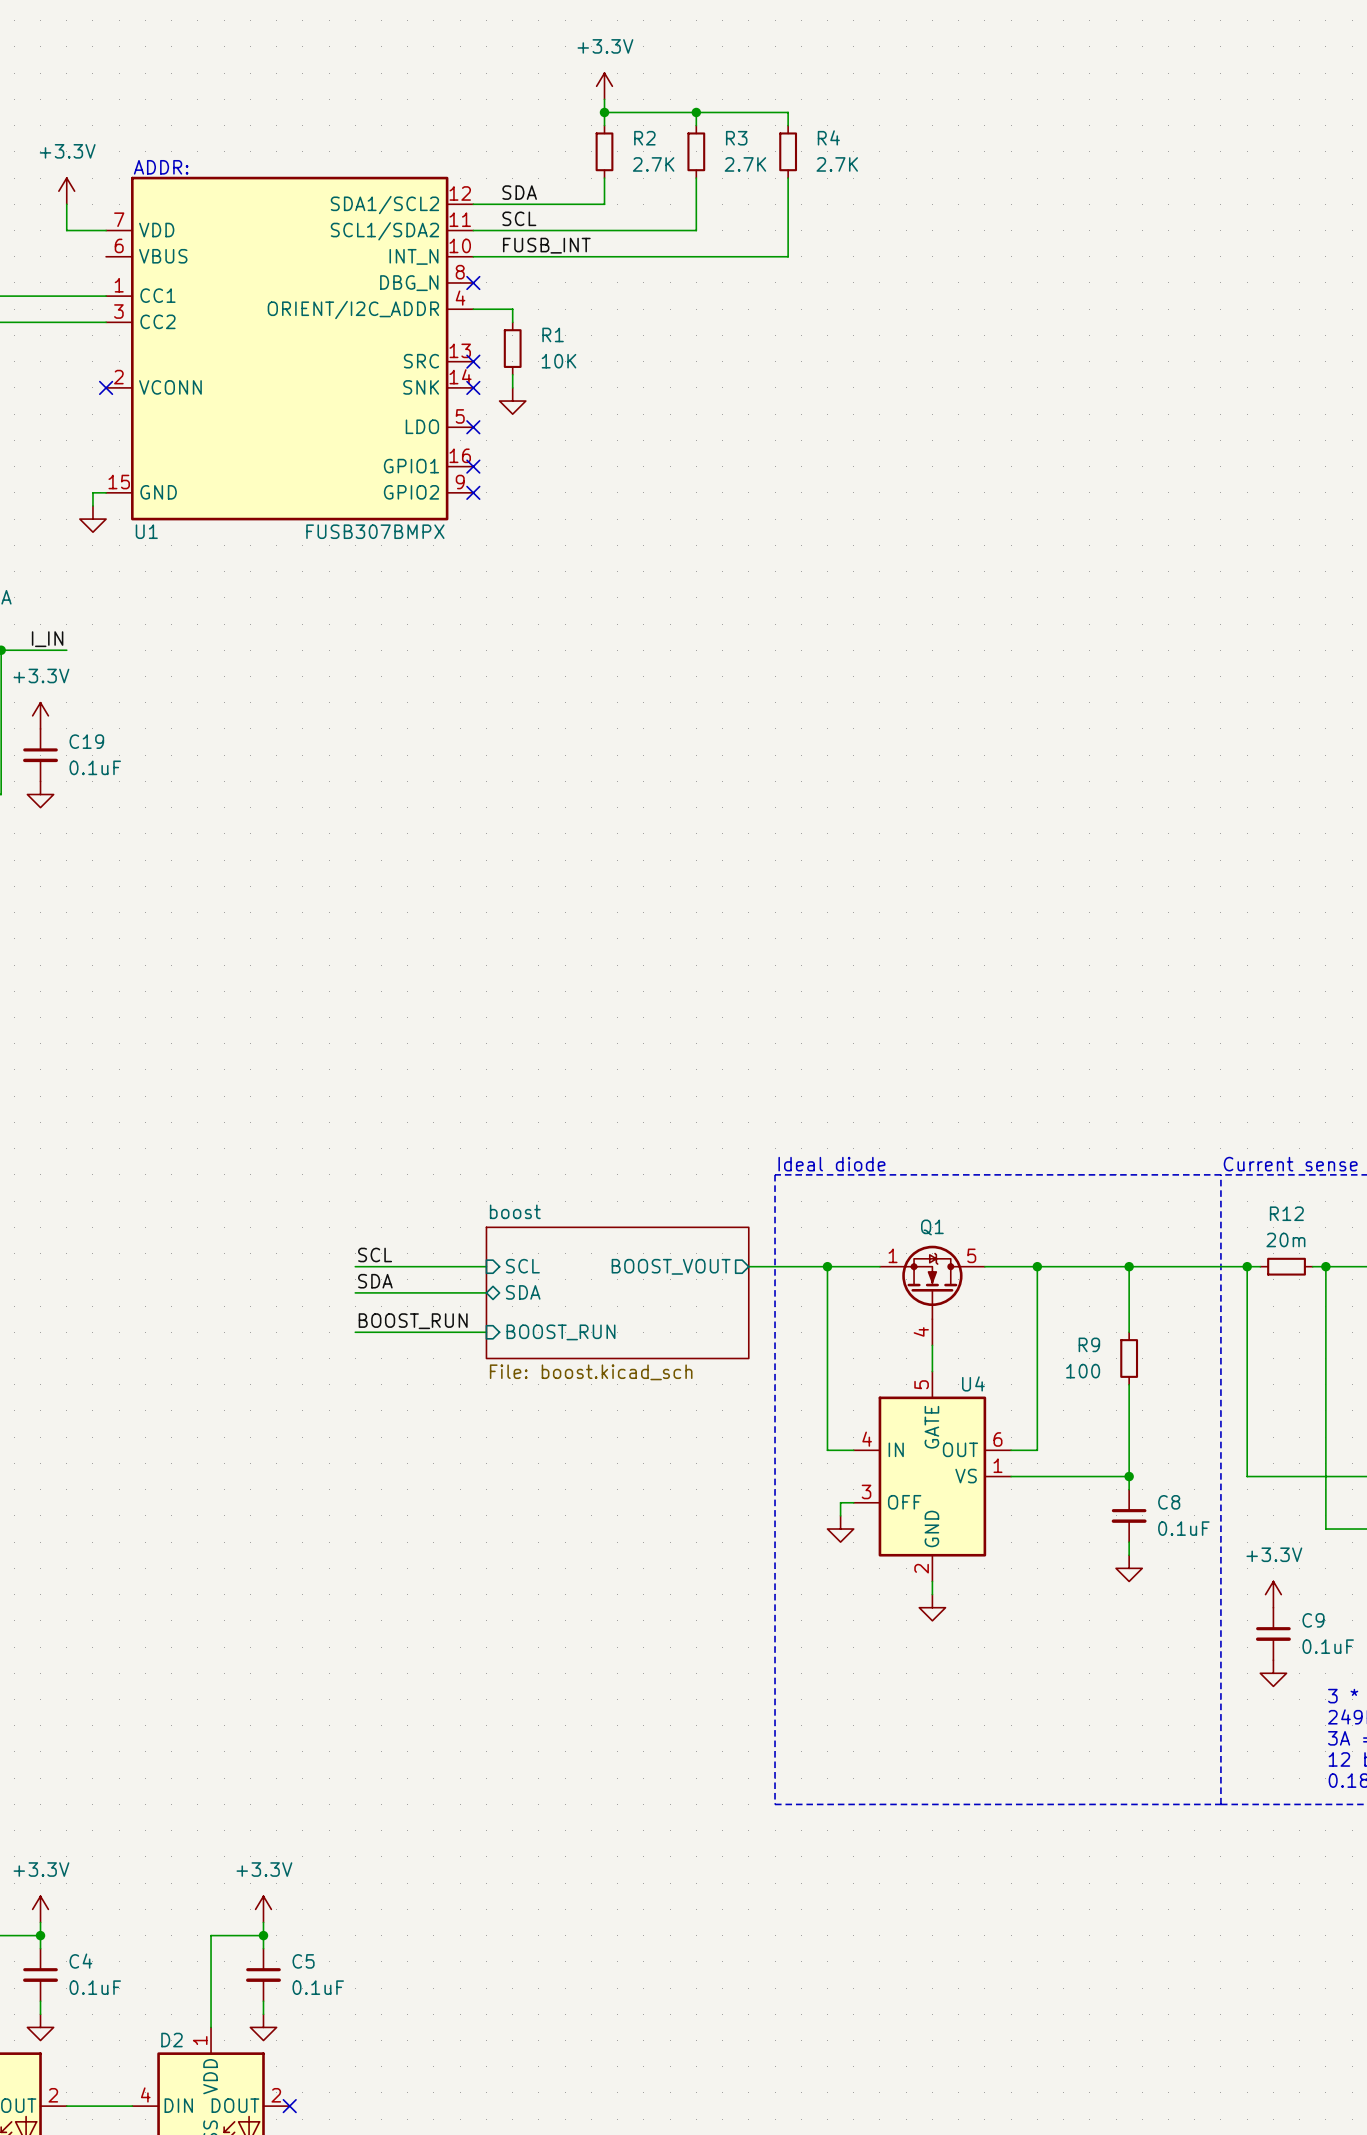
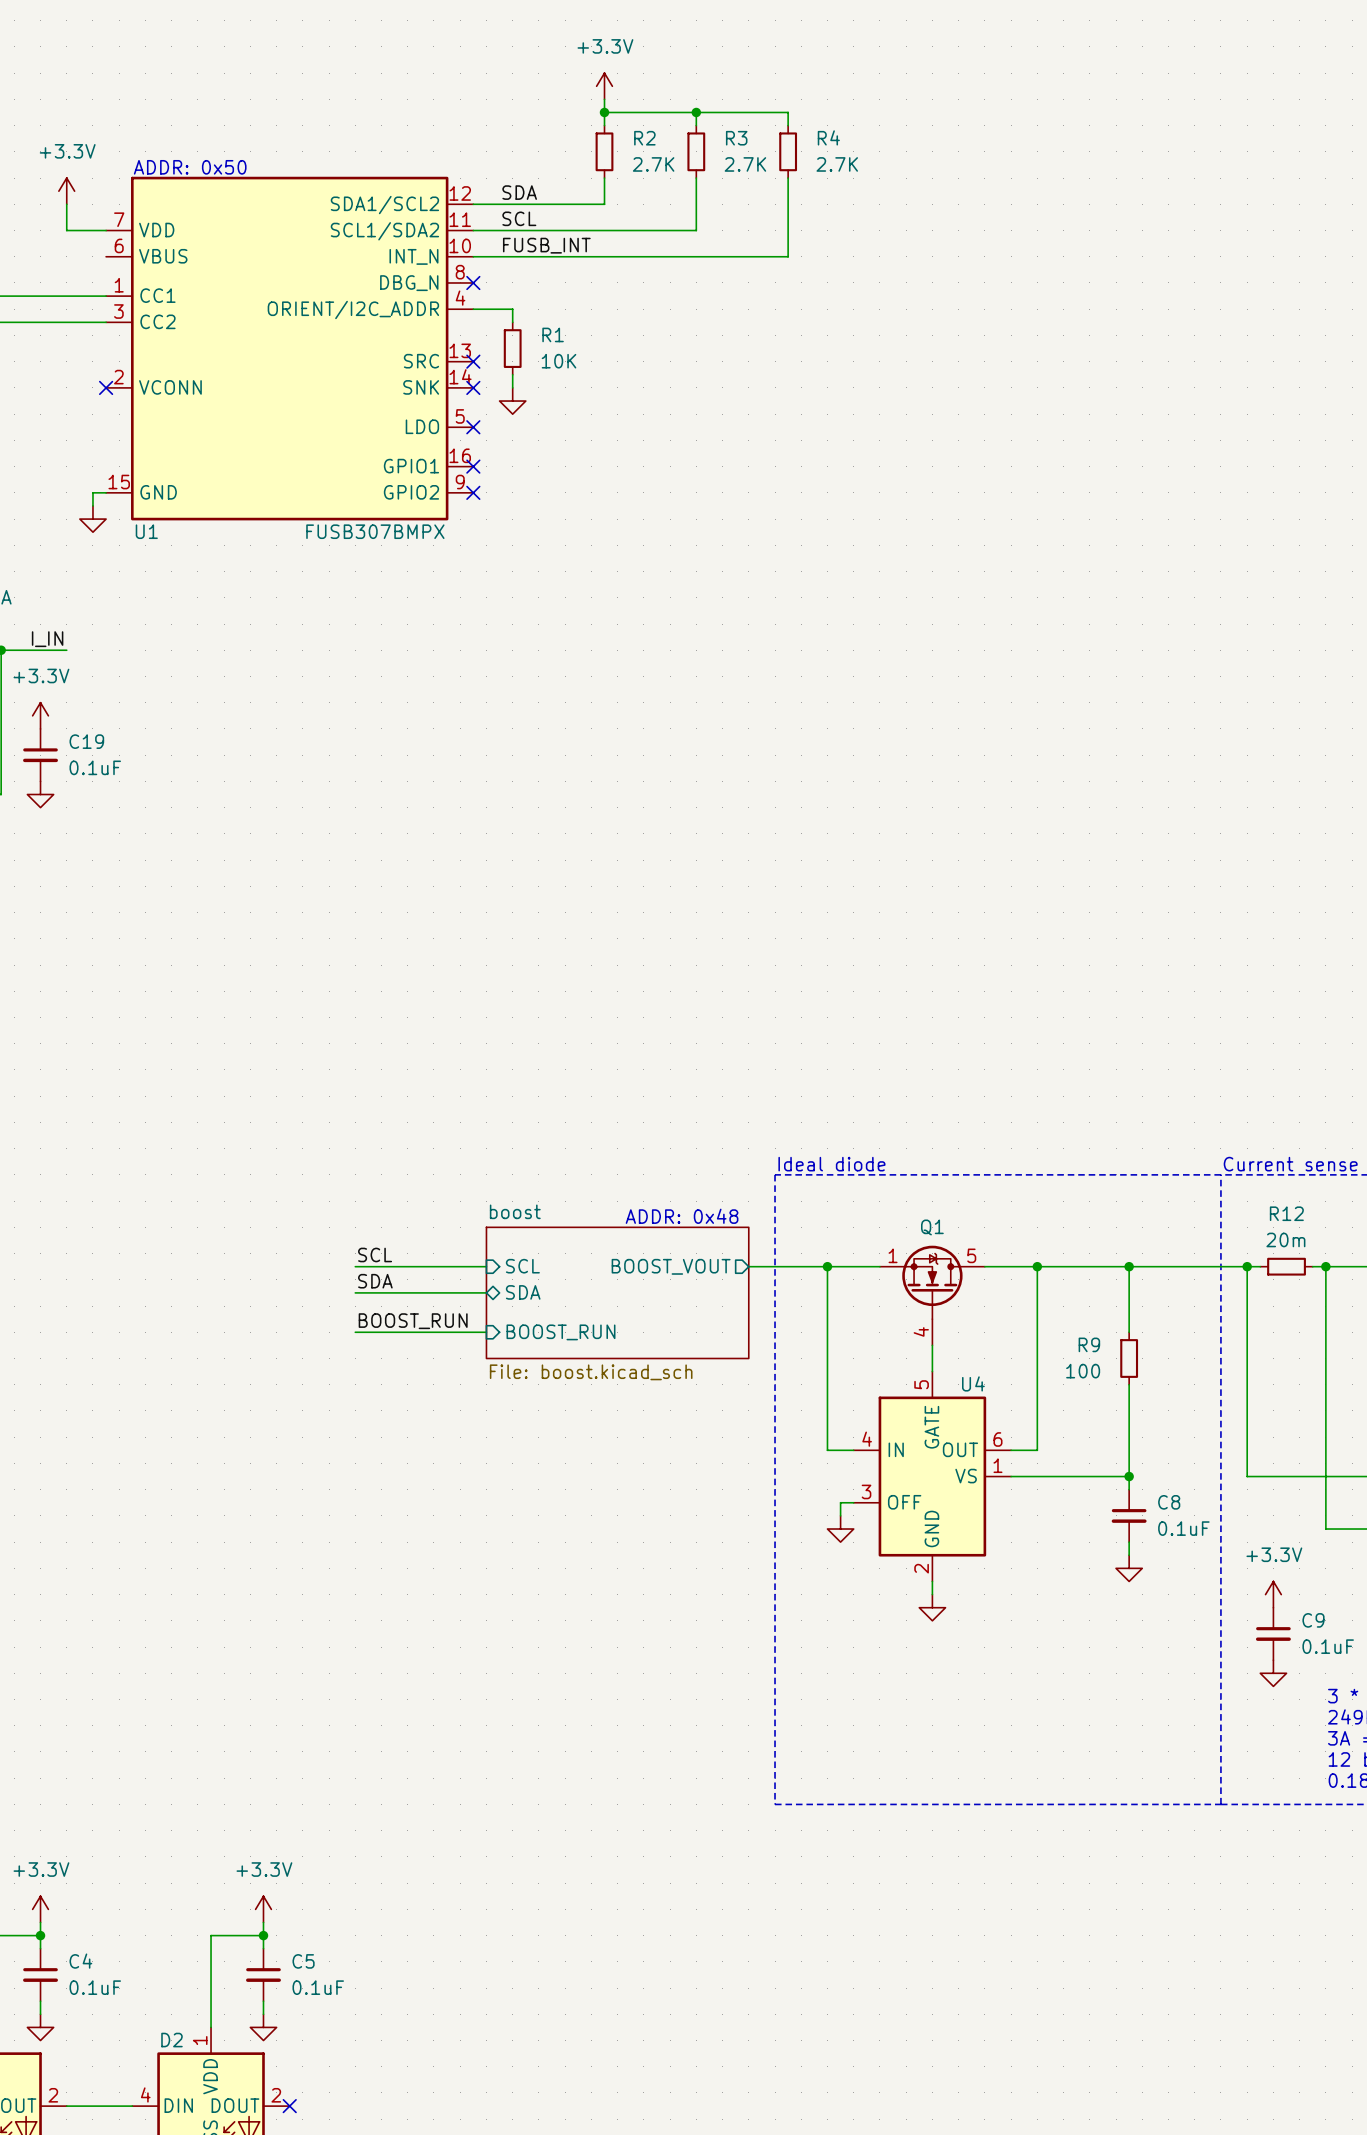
text: ADDR: (161, 167) -> ADDR: 0x50 (190, 167)
text: none -> ADDR: 0x48 (682, 1216)

